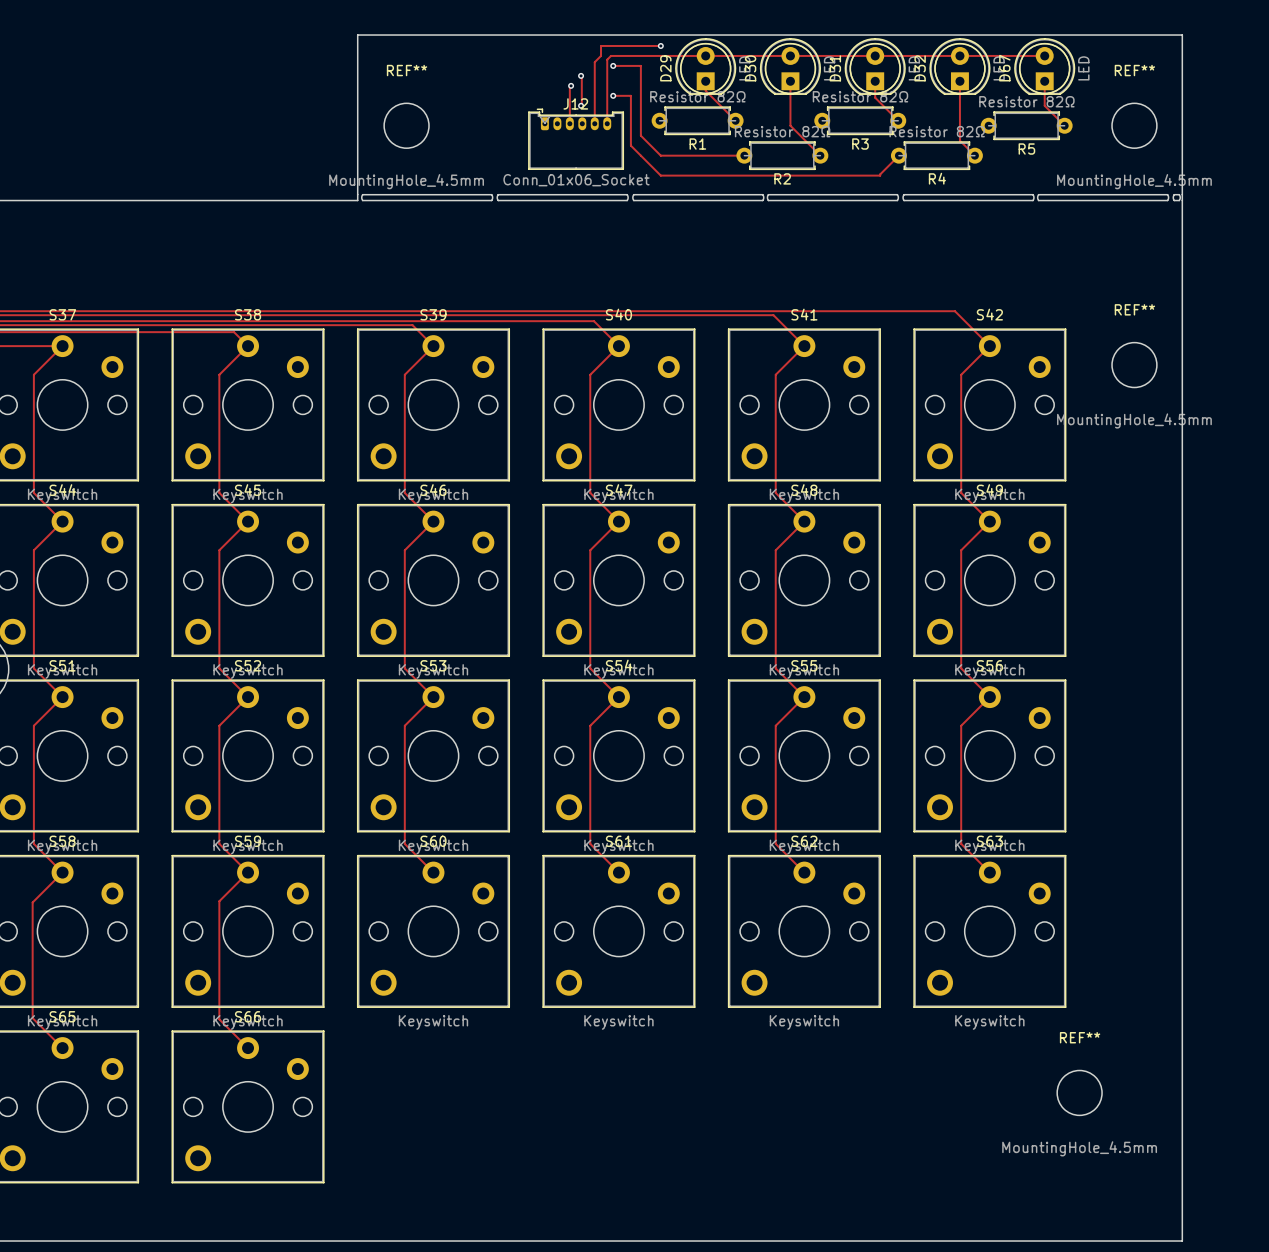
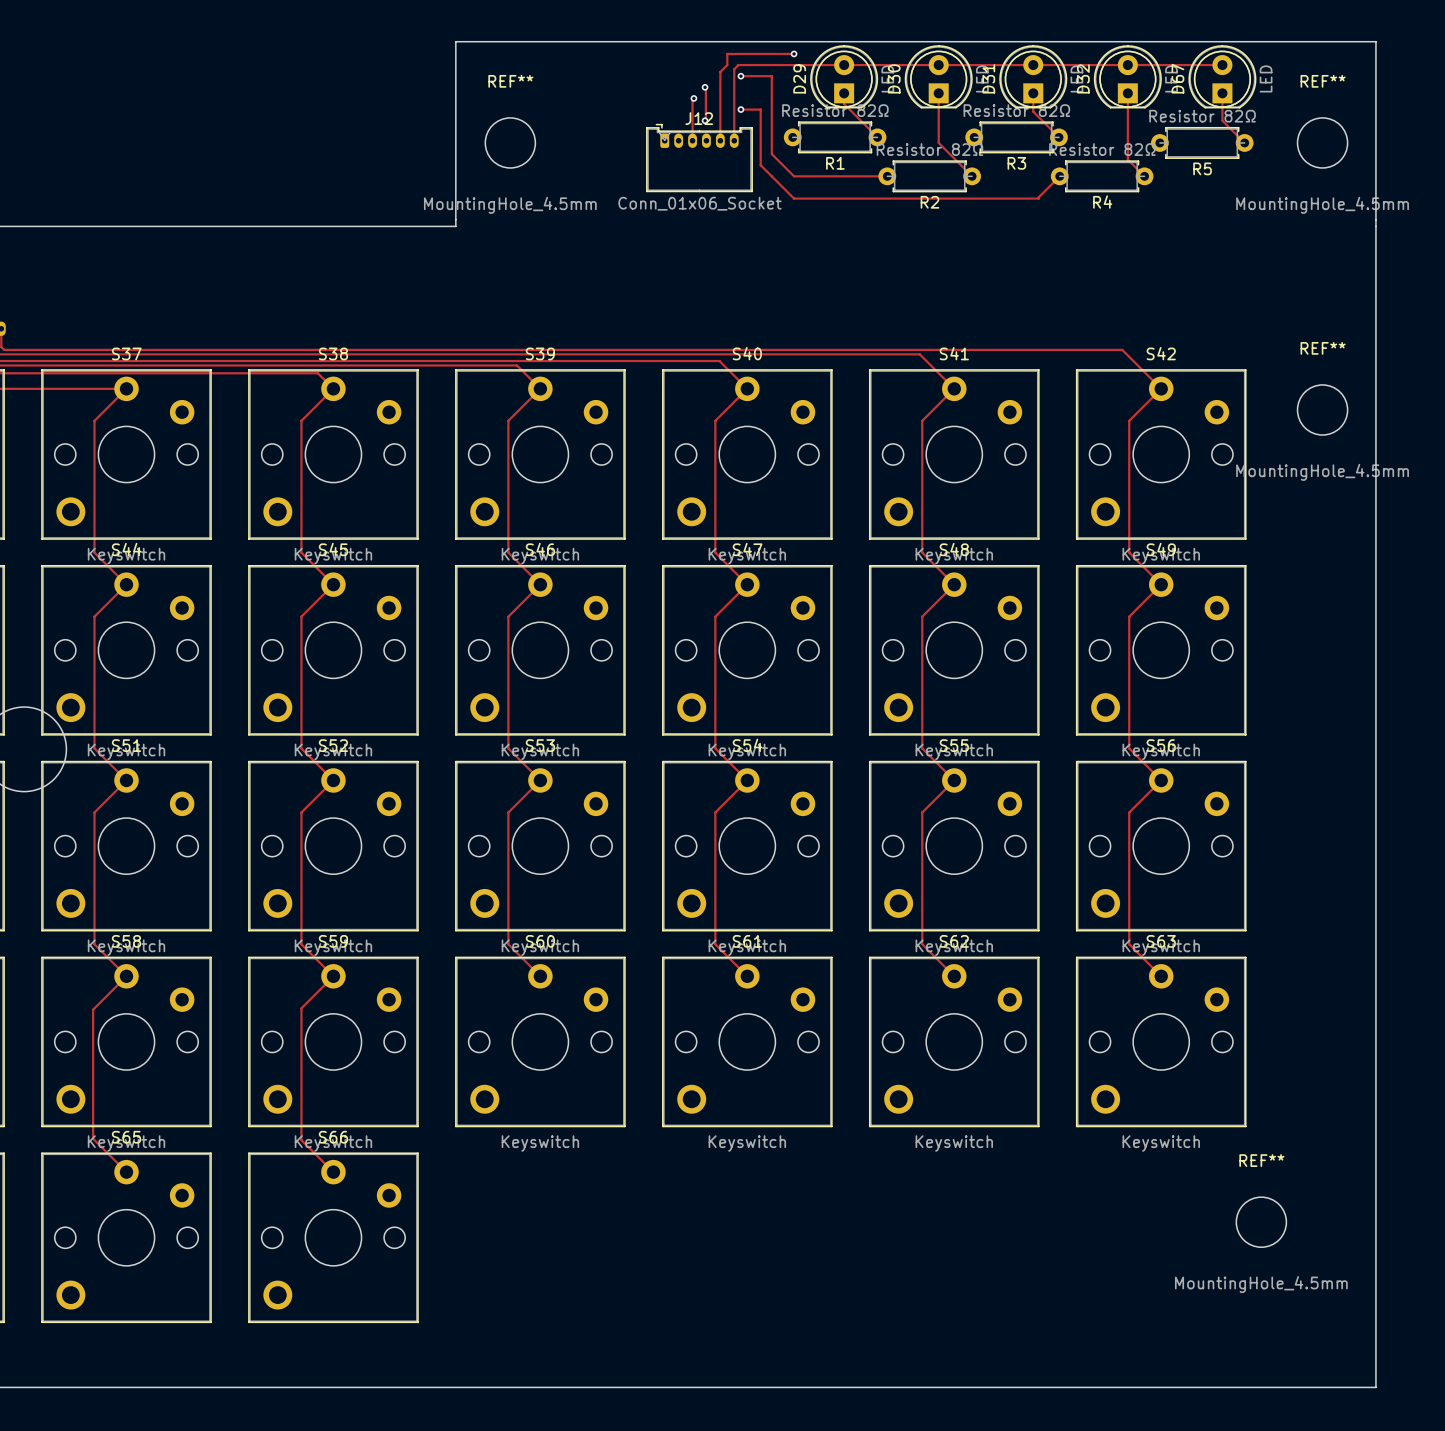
board edge: (362, 194) (491, 194) (492, 197) (491, 200) (362, 200) (362, 194) -> none
board edge: (498, 194) (627, 194) (628, 197) (627, 200) (498, 200) (498, 194) -> none
board edge: (633, 194) (762, 194) (763, 197) (762, 200) (633, 200) (633, 194) -> none
board edge: (768, 194) (897, 194) (898, 197) (897, 200) (768, 200) (768, 194) -> none
board edge: (904, 194) (1033, 194) (1033, 197) (1033, 200) (904, 200) (904, 194) -> none
board edge: (1038, 194) (1167, 194) (1168, 197) (1167, 200) (1038, 200) (1038, 194) -> none
board edge: (1174, 194) (1179, 194) (1179, 200) (1174, 200) (1174, 194) -> none

